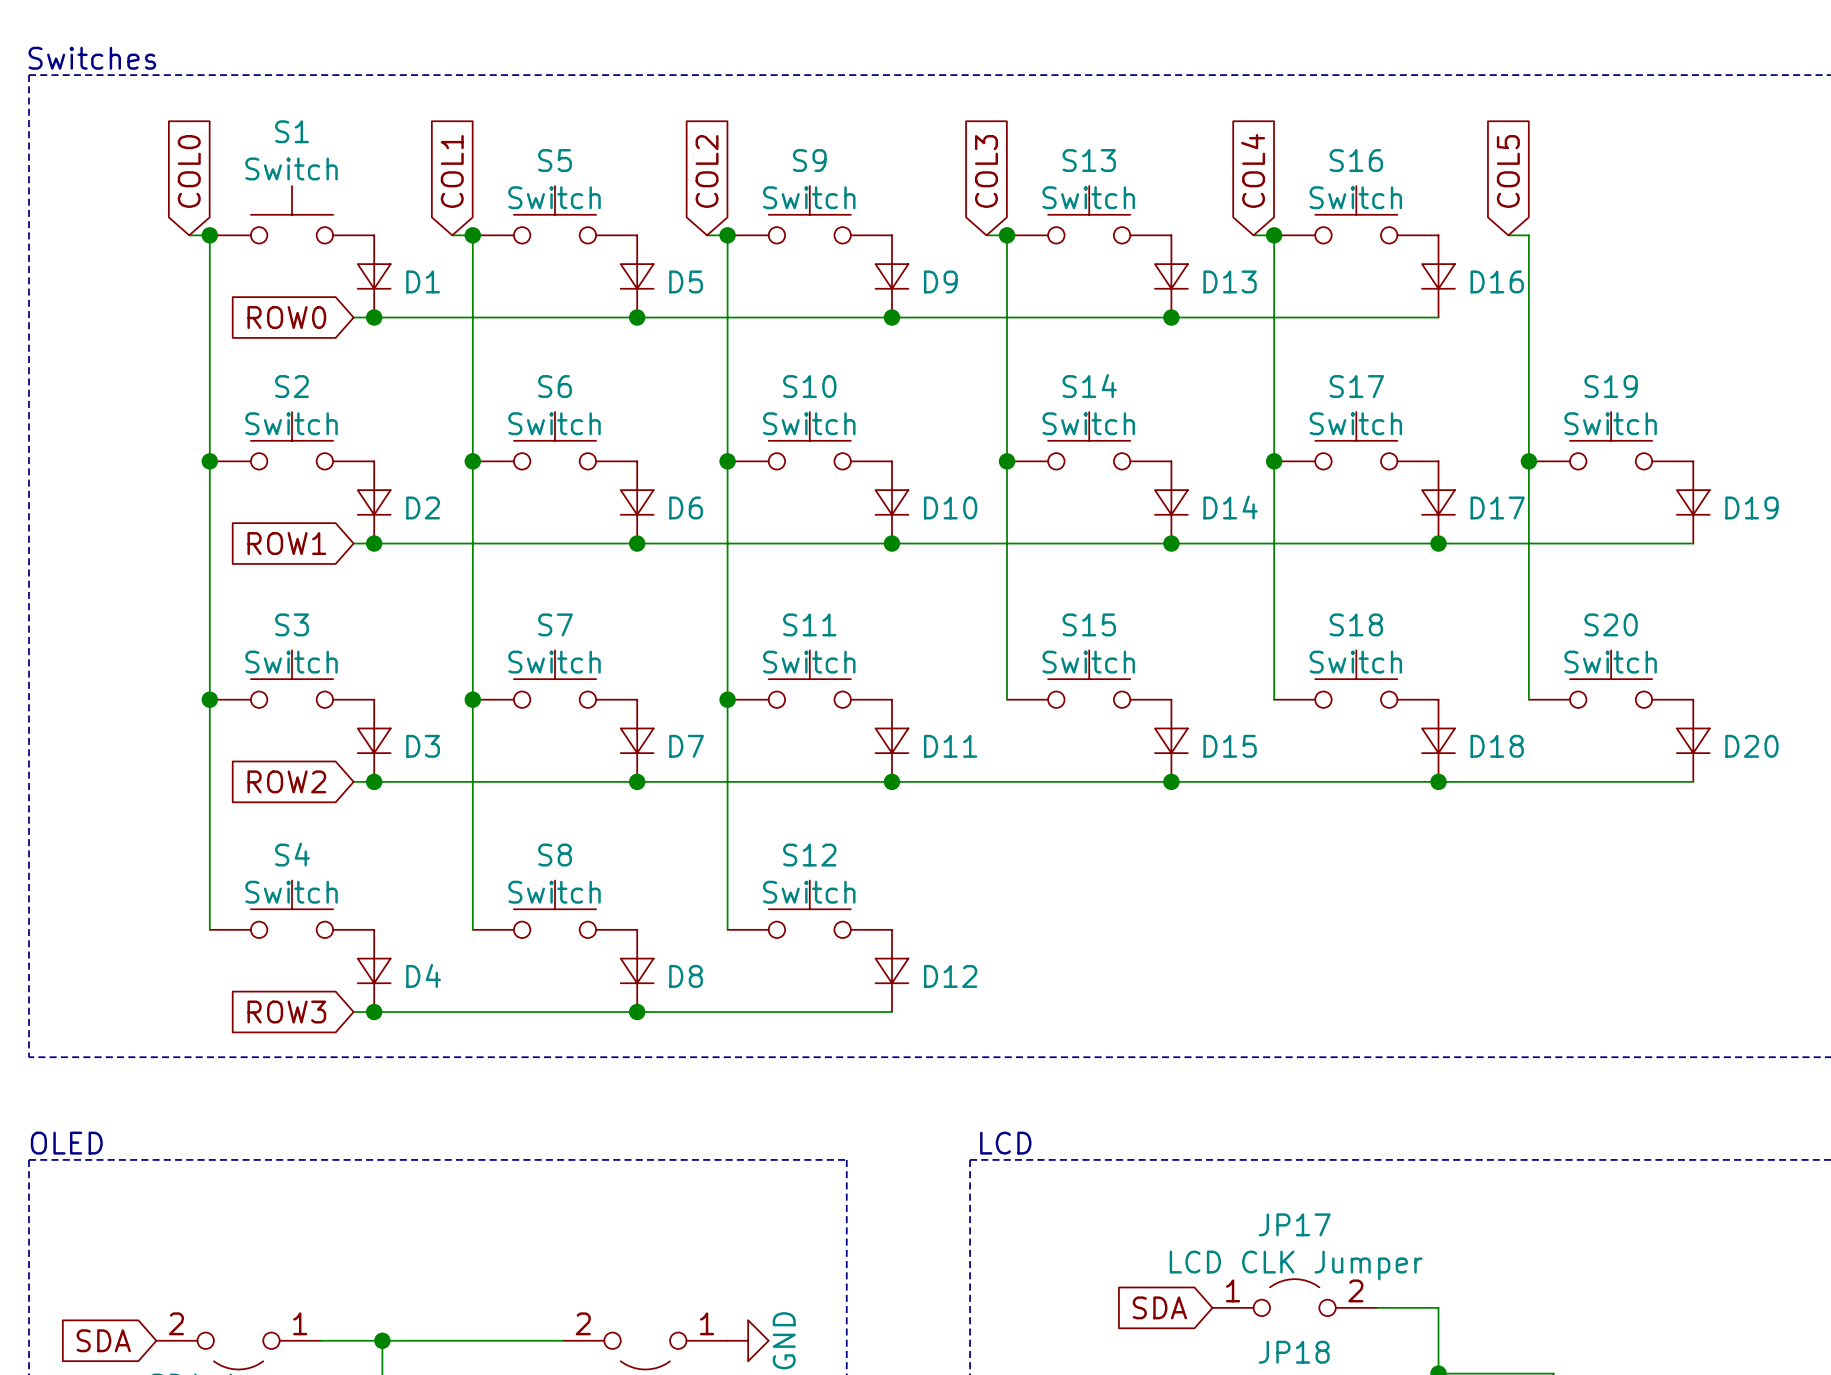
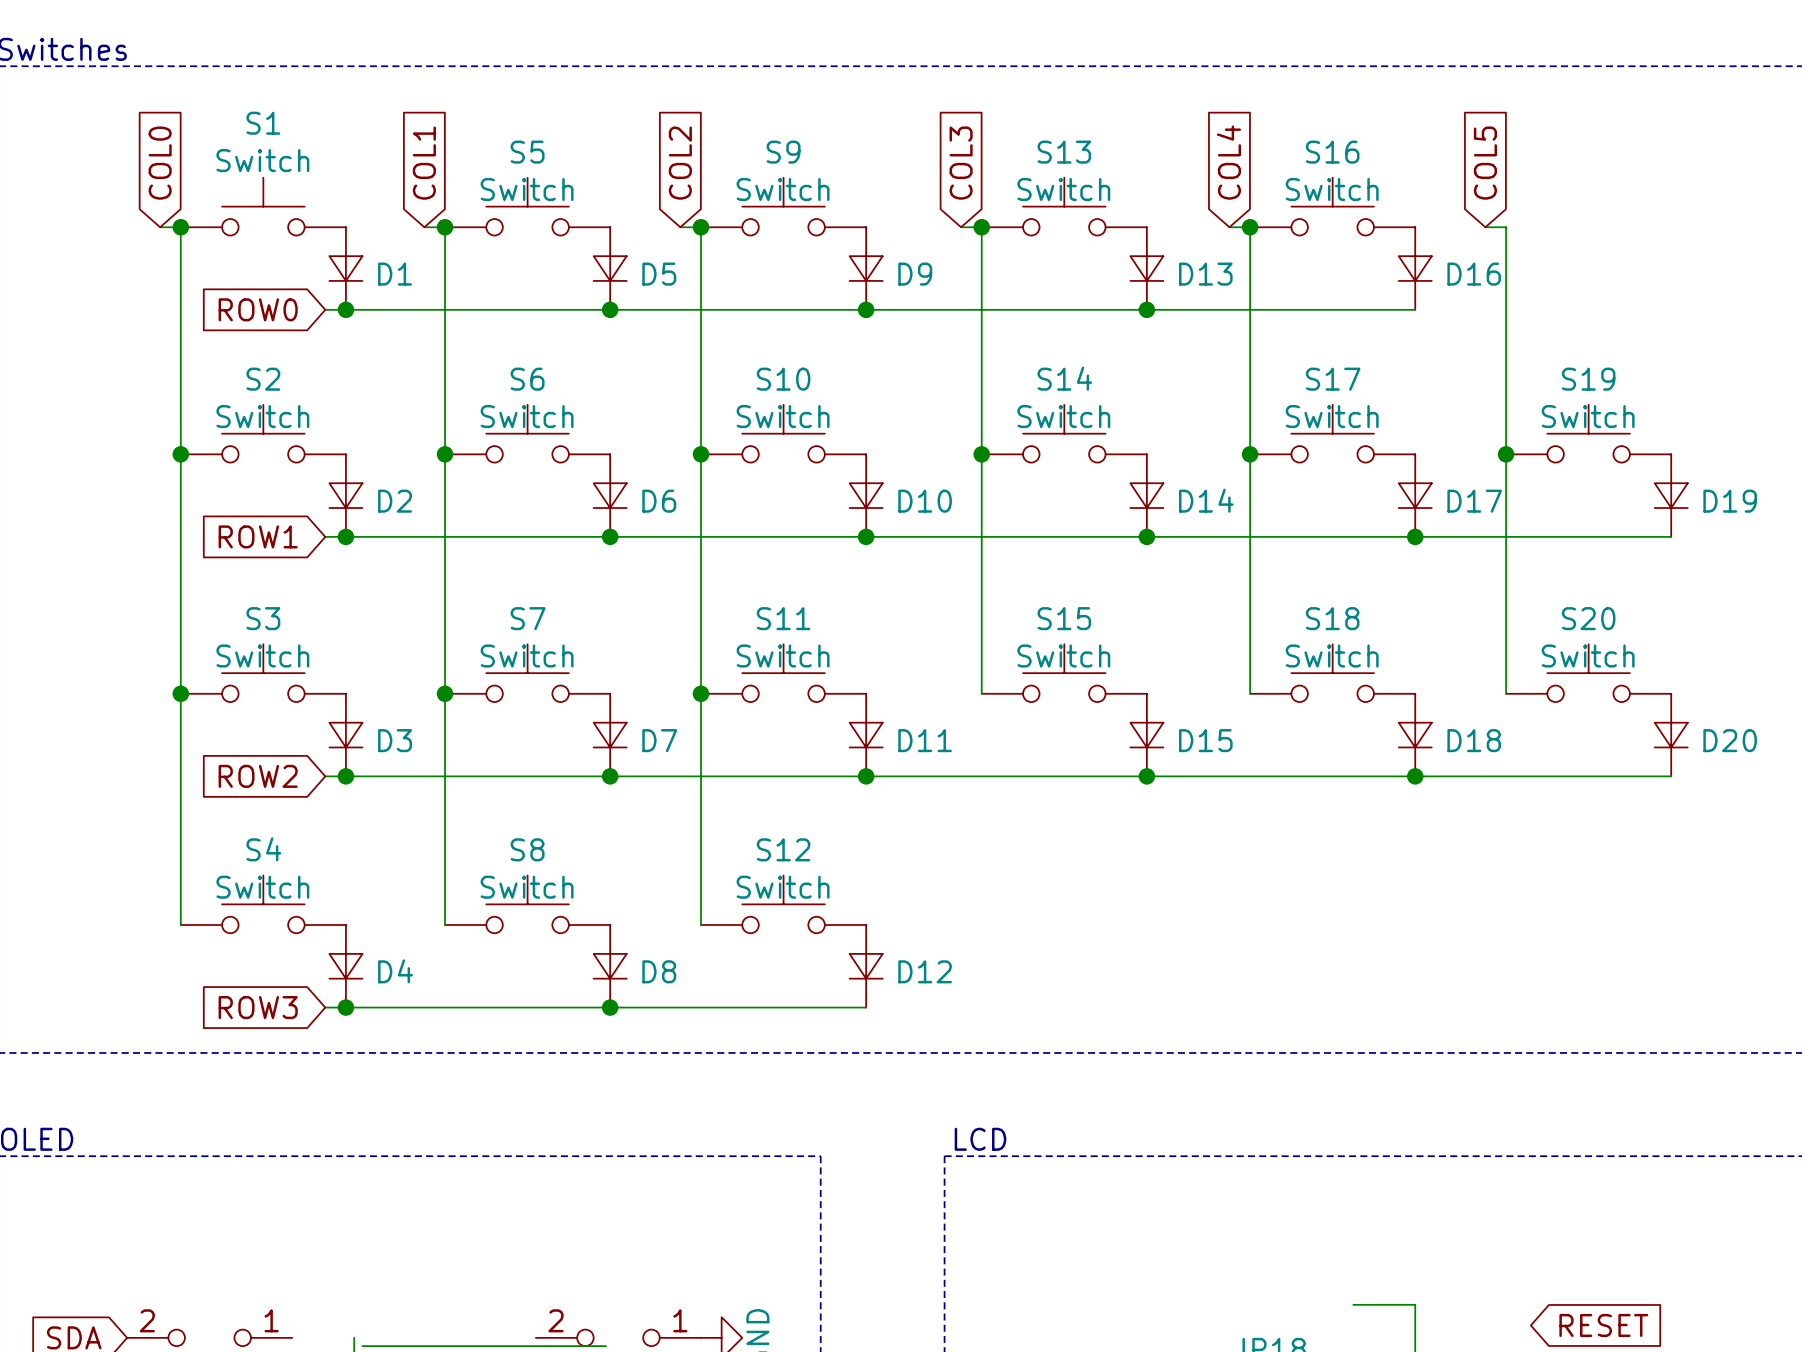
JP17: LCD CLK Jumper (1294, 1297) -> none
global label: SDA (1159, 1307) -> none
global label: none -> RESET (1603, 1325)
wire: (320, 1340) (563, 1340) -> (362, 1346) (606, 1346)
junction: (382, 1340) -> none

